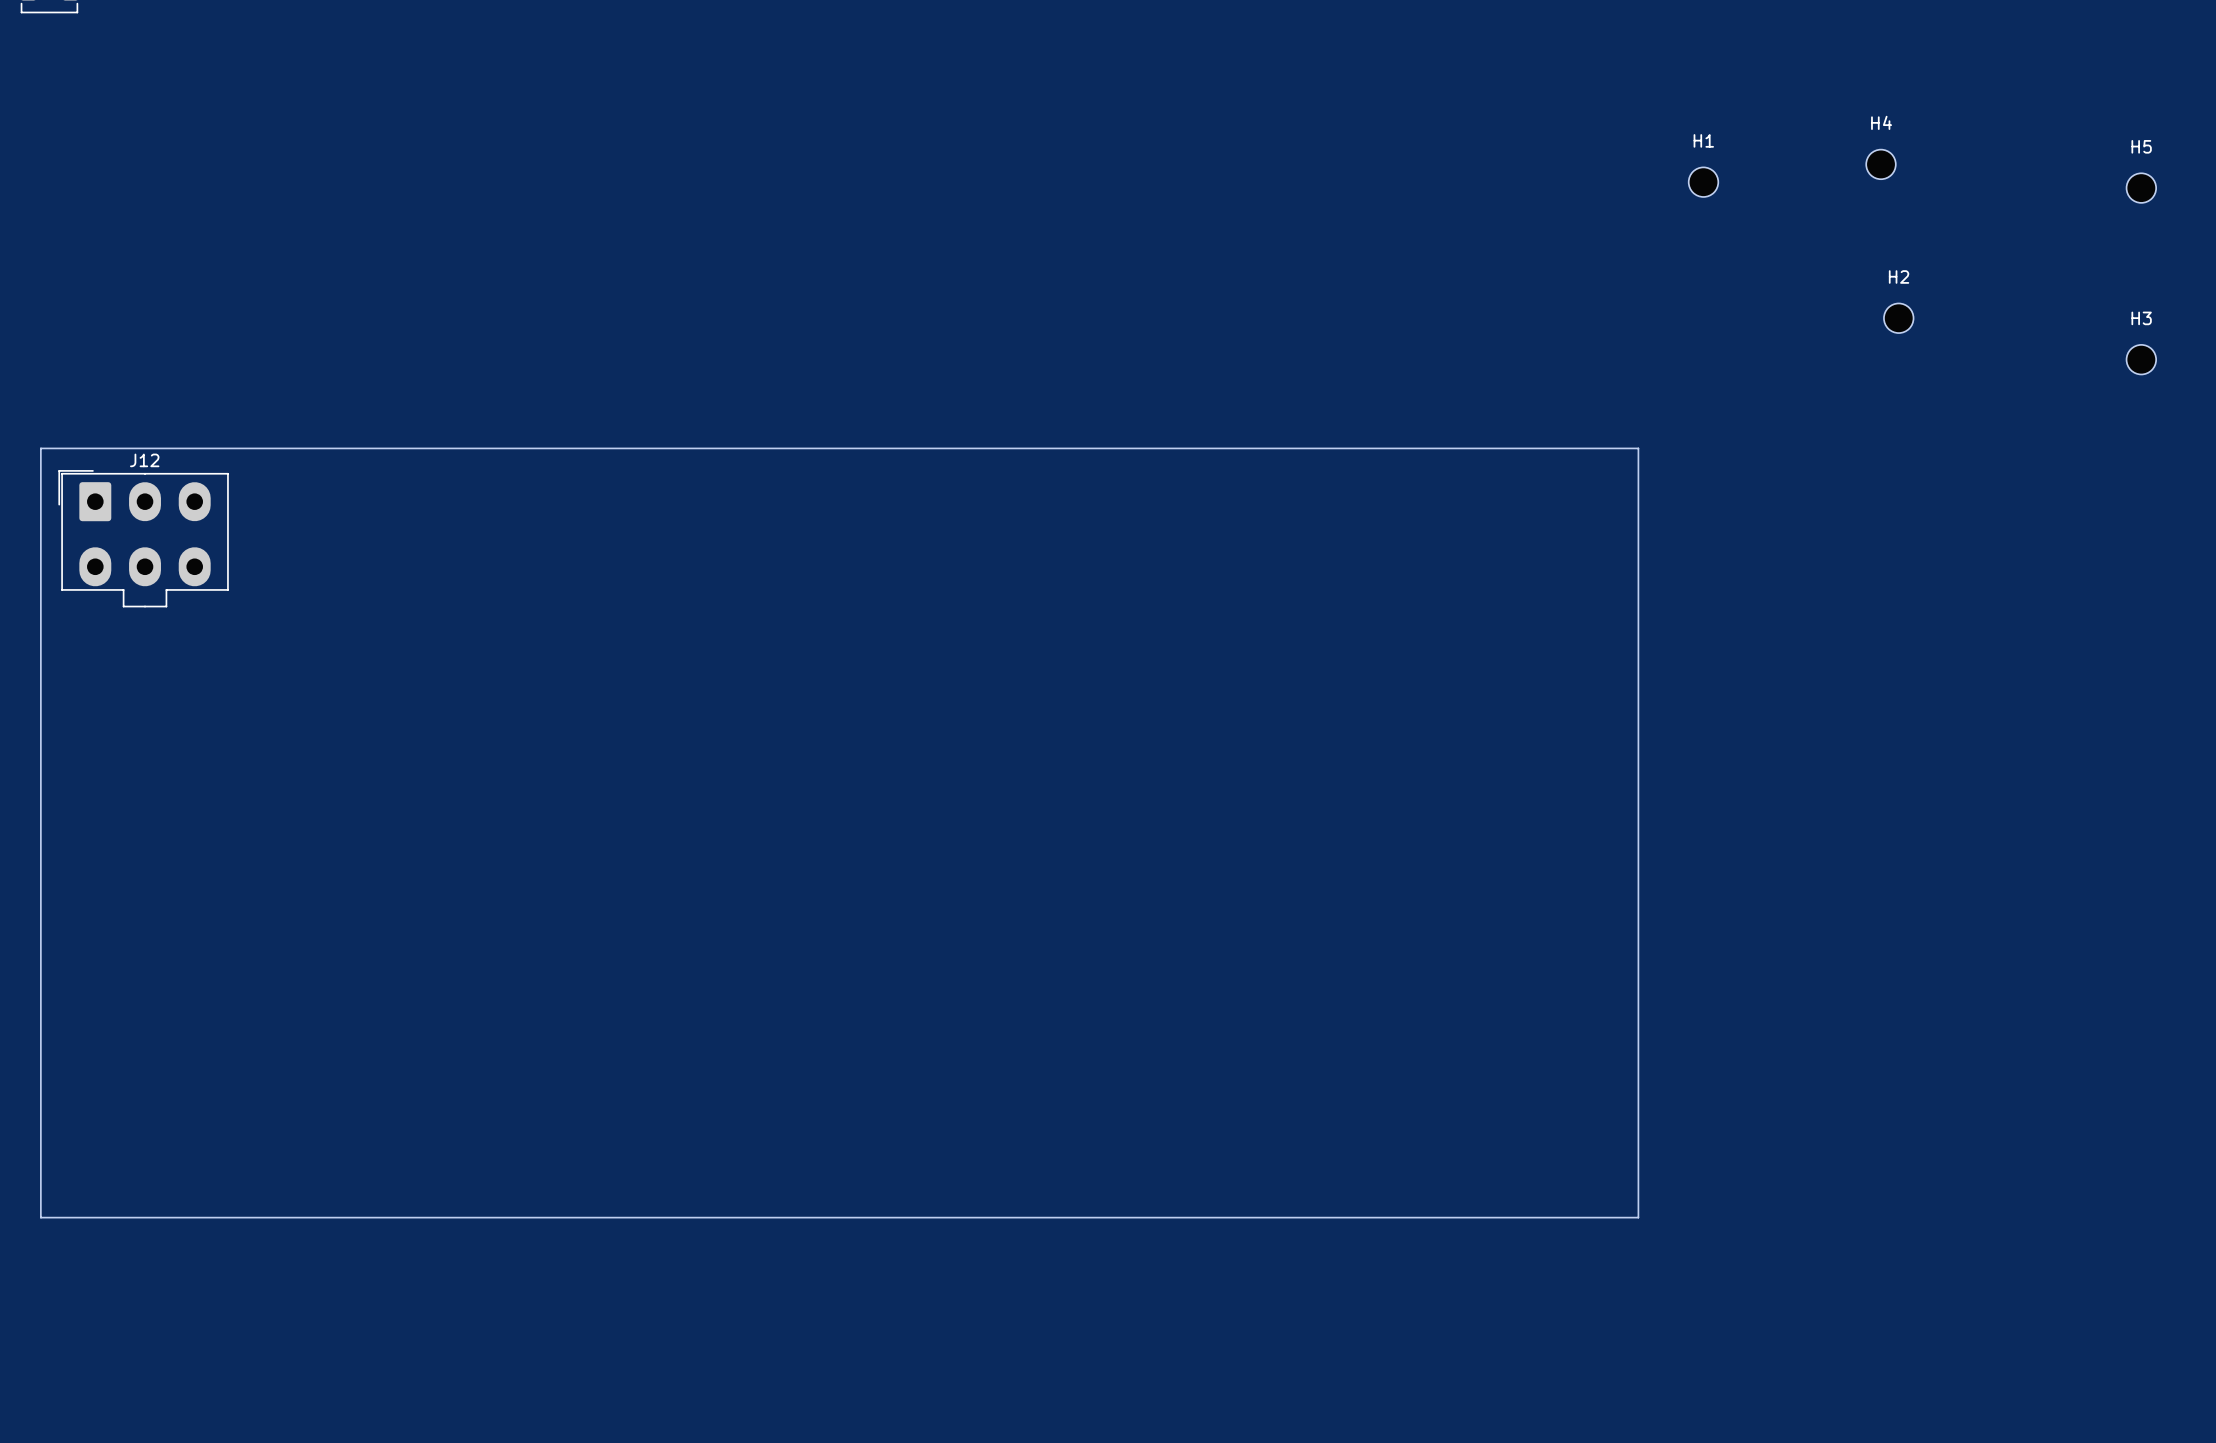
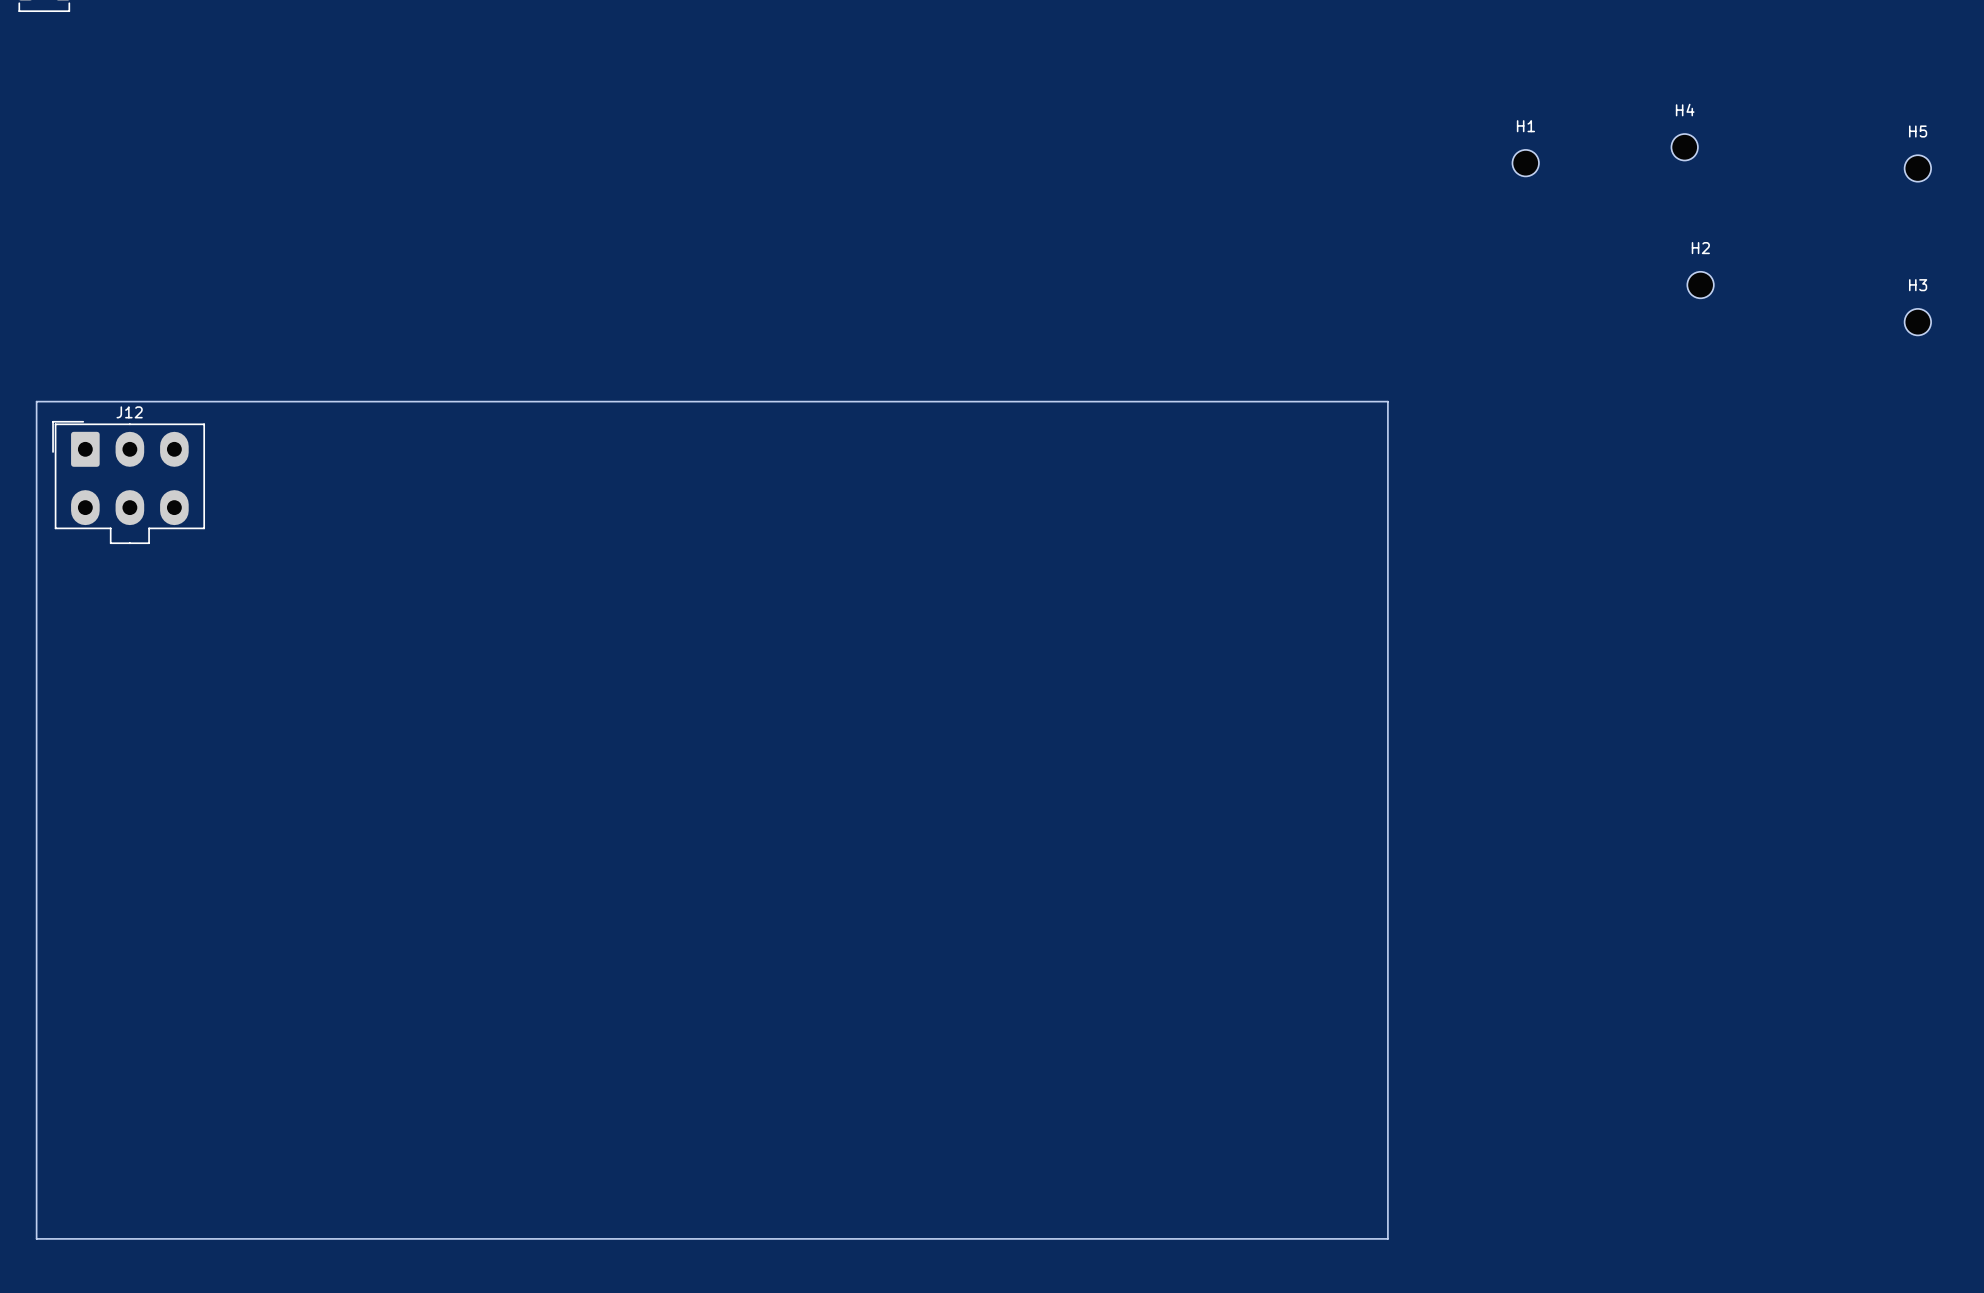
board edge: (1549, 448) (1638, 448) (1638, 1217) (40, 1217) -> (1387, 401) (1387, 1238) (36, 1238) (36, 1090)

